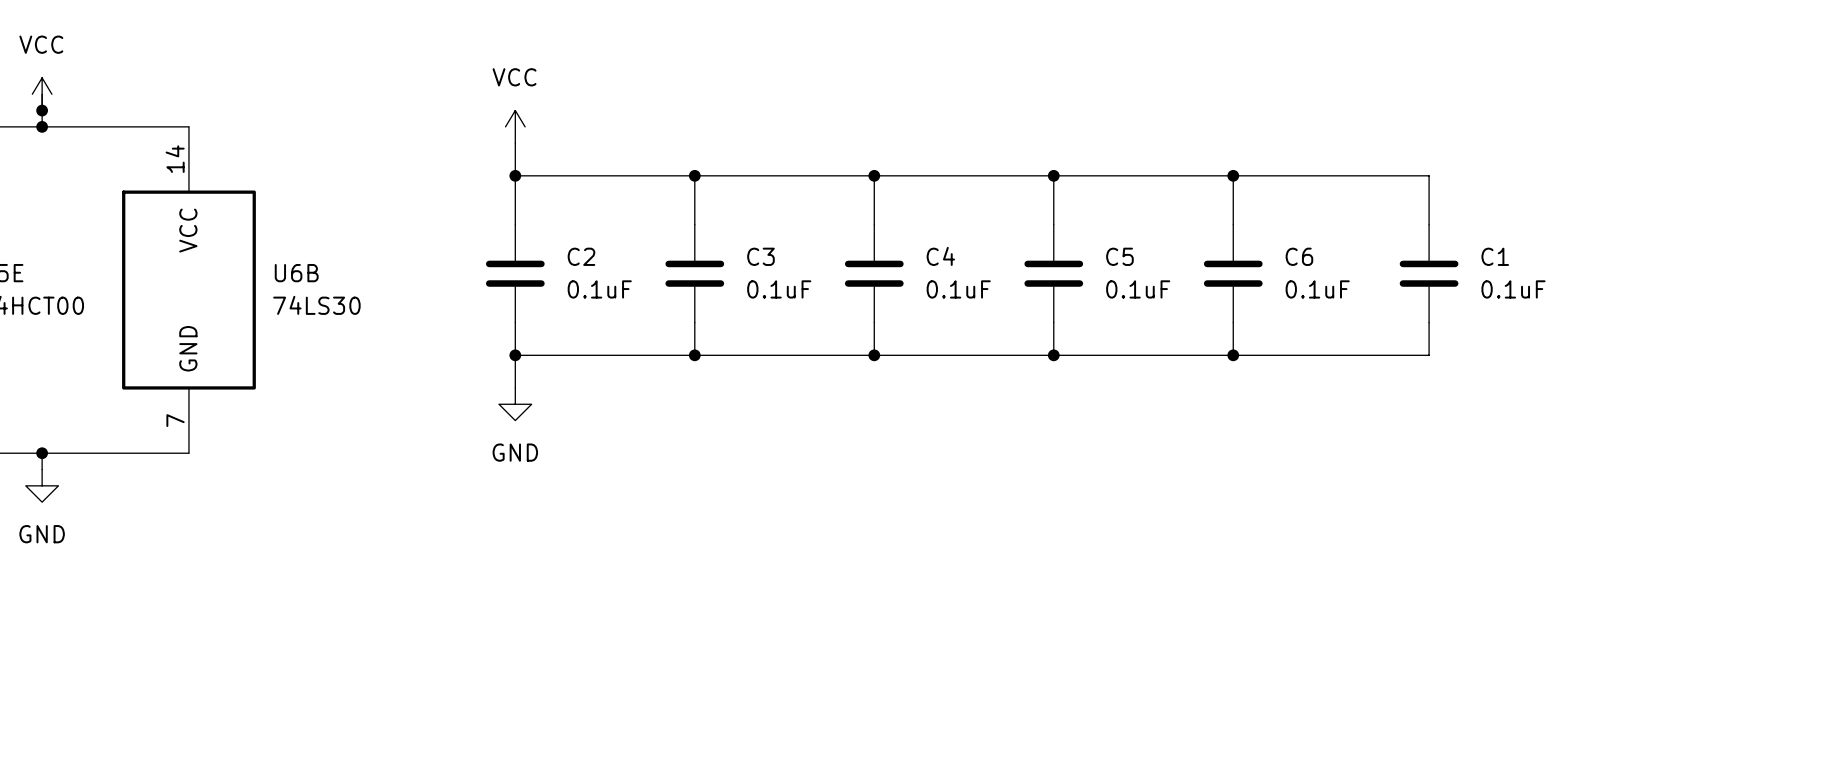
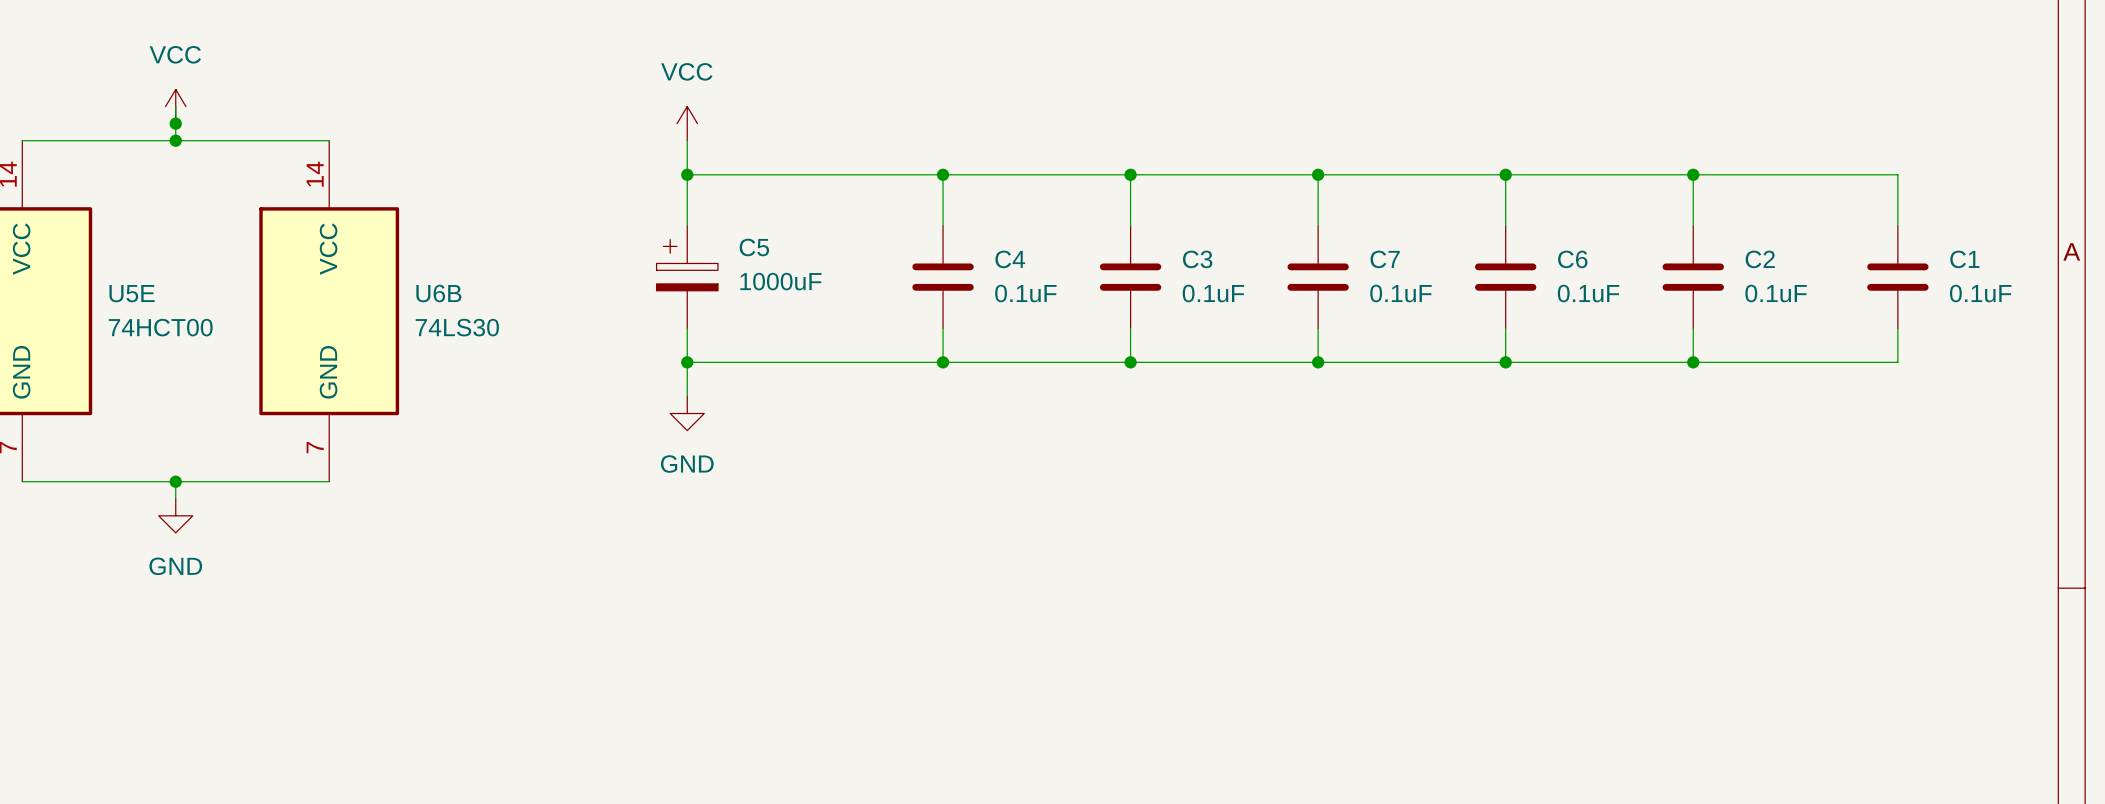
power symbol position: VCC (515, 126) -> VCC (687, 123)
wire: (515, 143) (515, 224) -> (687, 140) (687, 225)
wire: none -> (687, 174) (1897, 174) (1897, 225)
junction: none -> (943, 174)
junction: none -> (1130, 174)
junction: none -> (1318, 174)
junction: none -> (1505, 174)
wire: none -> (1693, 174) (1693, 225)
junction: none -> (1693, 174)
wire: (515, 175) (1429, 175) (1429, 224) -> none
junction position: (515, 175) -> (687, 174)
wire: (694, 175) (694, 224) -> (943, 174) (943, 225)
junction: (694, 175) -> none
wire: (874, 175) (874, 224) -> (1130, 174) (1130, 225)
junction: (874, 175) -> none
wire: (1053, 175) (1053, 224) -> (1318, 174) (1318, 225)
junction: (1053, 175) -> none
wire: (1233, 175) (1233, 224) -> (1505, 174) (1505, 225)
junction: (1233, 175) -> none
C5 symbol: [1024, 224, 1084, 323] -> [656, 225, 718, 329]
C7: none -> 0.1uF (1318, 277)
C2 position: (515, 273) -> (1693, 277)
C3 position: (694, 273) -> (1130, 277)
C4 position: (874, 273) -> (943, 277)
C6 position: (1233, 273) -> (1505, 277)
C1 position: (1429, 273) -> (1897, 277)
C5 value: 0.1uF (1138, 289) -> 1000uF (780, 281)
wire: none -> (1693, 328) (1693, 362)
wire: none -> (1897, 328) (1897, 362) (687, 362)
wire: (515, 322) (515, 387) -> (687, 328) (687, 396)
wire: (694, 322) (694, 355) -> (943, 328) (943, 362)
wire: (874, 322) (874, 355) -> (1130, 328) (1130, 362)
wire: (1053, 322) (1053, 355) -> (1318, 328) (1318, 362)
wire: (1233, 322) (1233, 355) -> (1505, 328) (1505, 362)
wire: (1429, 322) (1429, 355) (515, 355) -> none
junction: none -> (943, 362)
junction: none -> (1130, 362)
junction: none -> (1318, 362)
junction: none -> (1505, 362)
junction: none -> (1693, 362)
junction position: (515, 355) -> (687, 362)
junction: (694, 355) -> none
junction: (874, 355) -> none
junction: (1053, 355) -> none
junction: (1233, 355) -> none
power symbol position: GND (515, 404) -> GND (687, 413)

